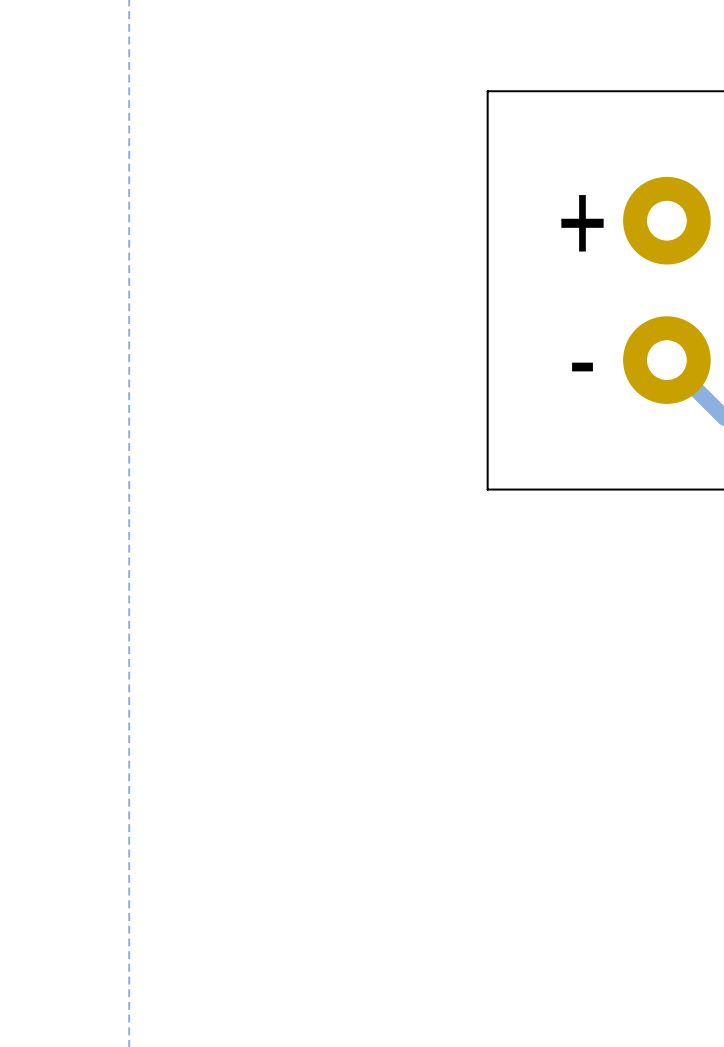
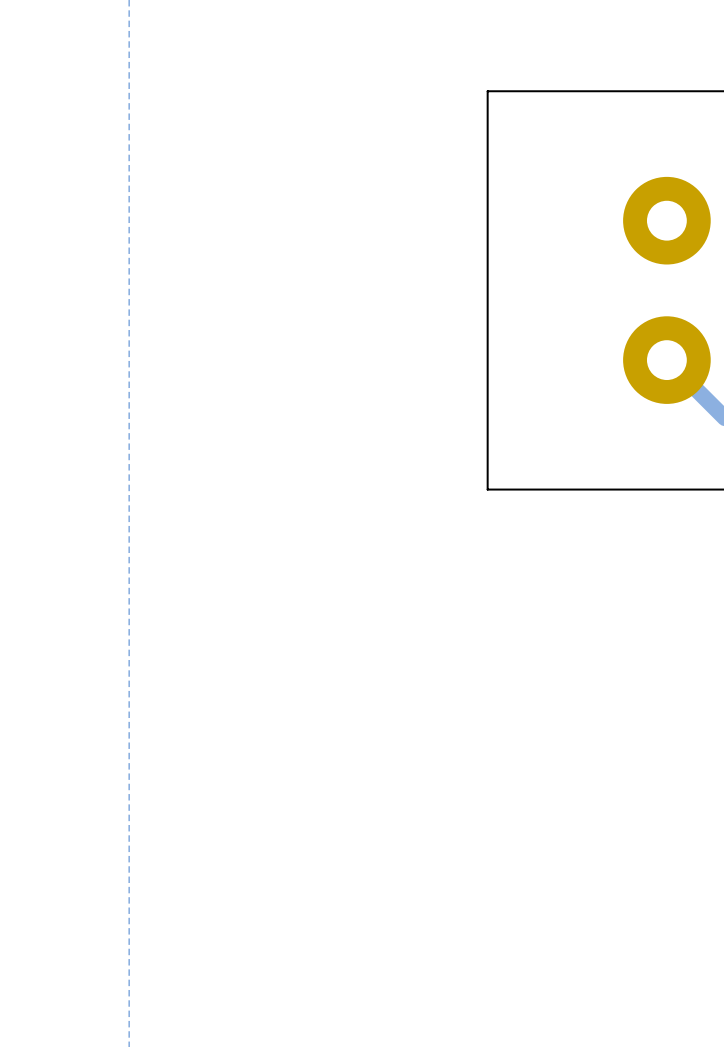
text: + (582, 223) -> none
text: - (582, 367) -> none

